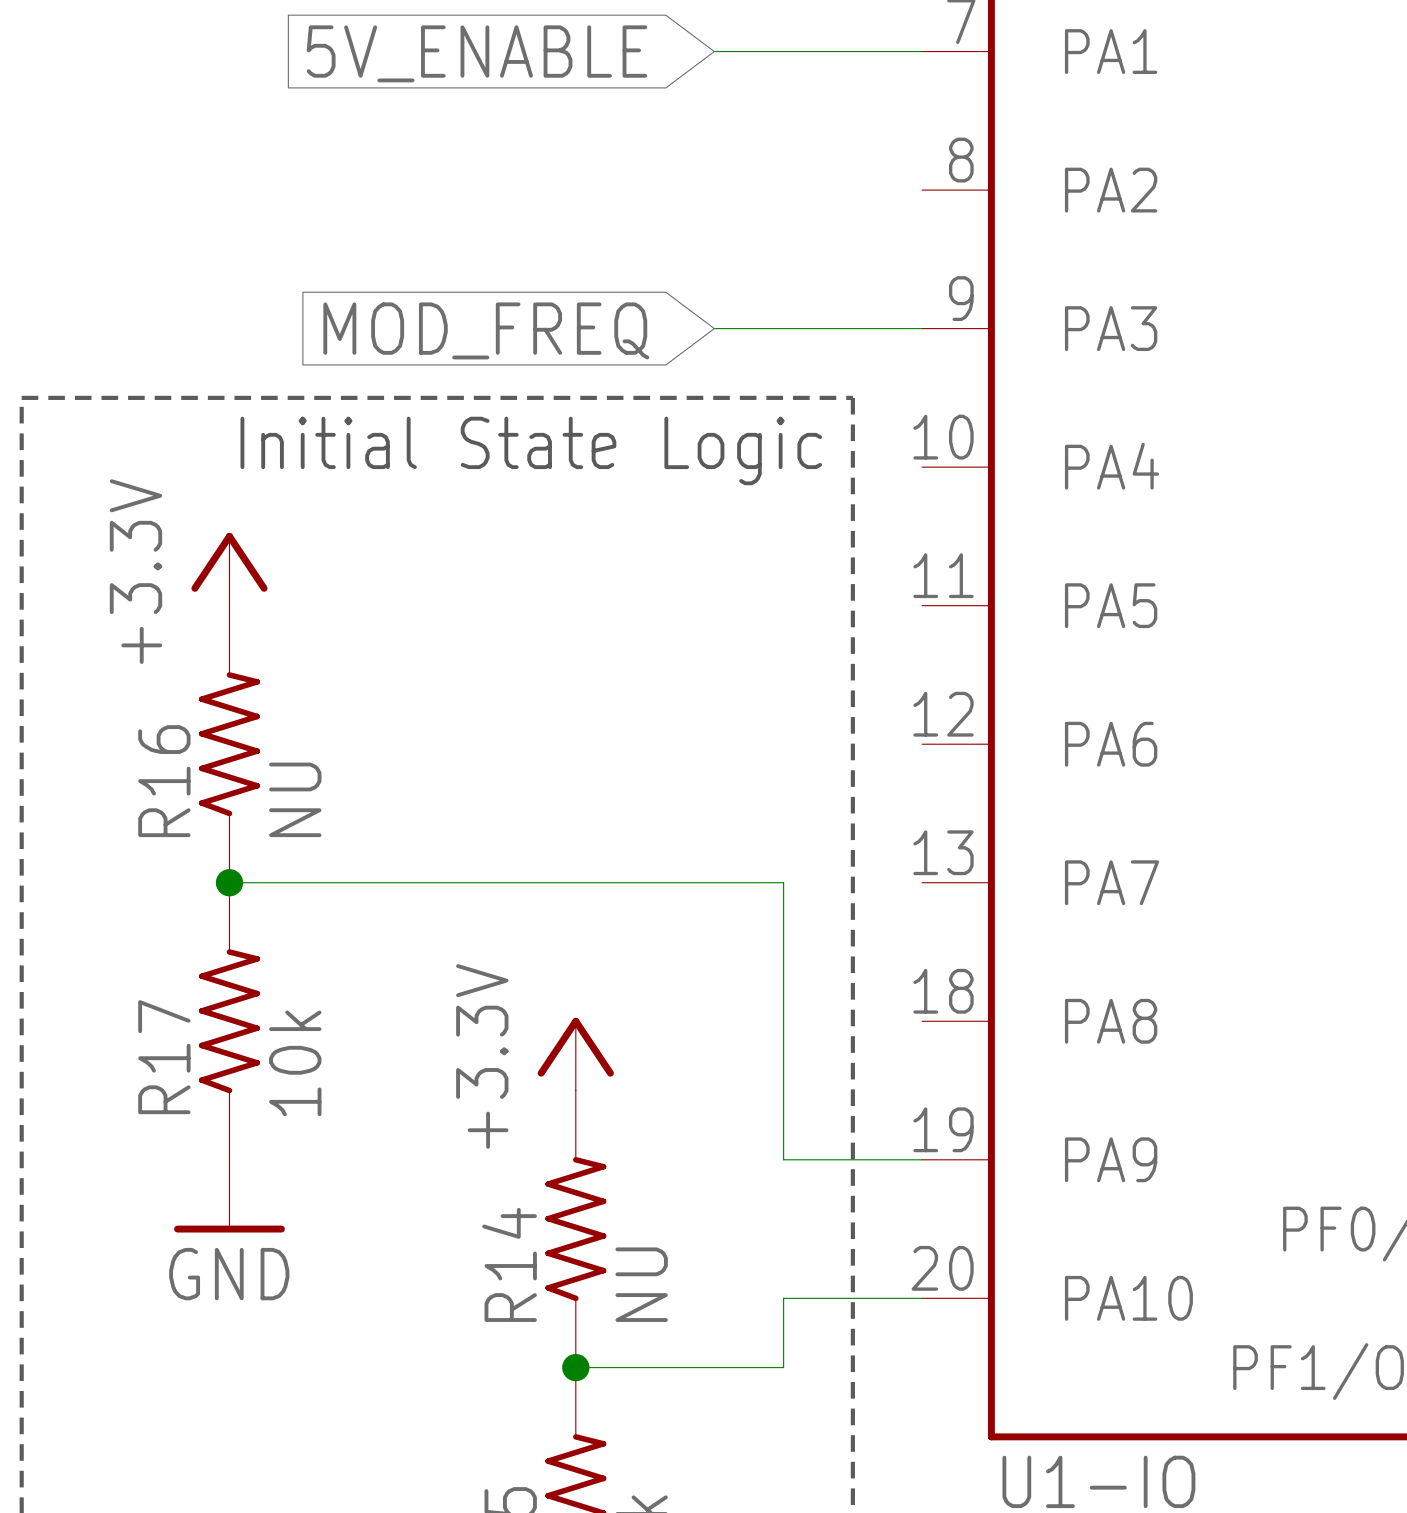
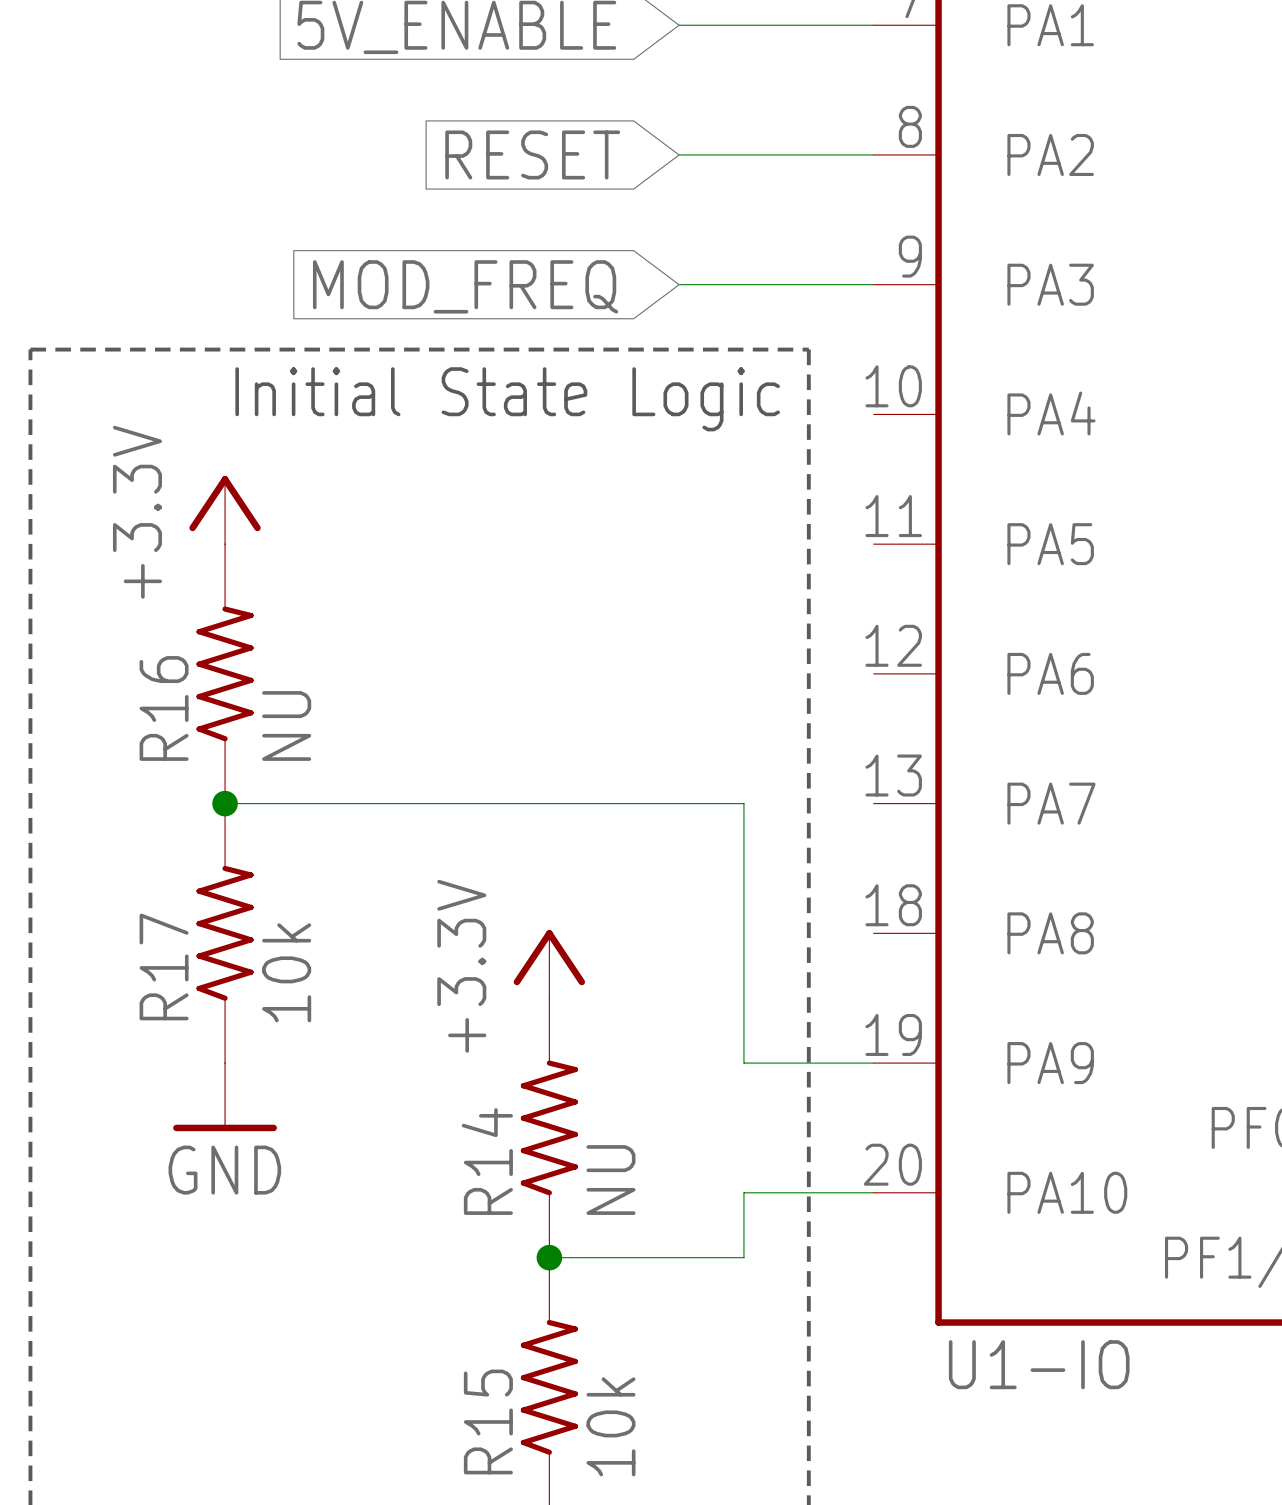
global label: none -> RESET (532, 154)
wire: none -> (679, 154) (873, 154)

